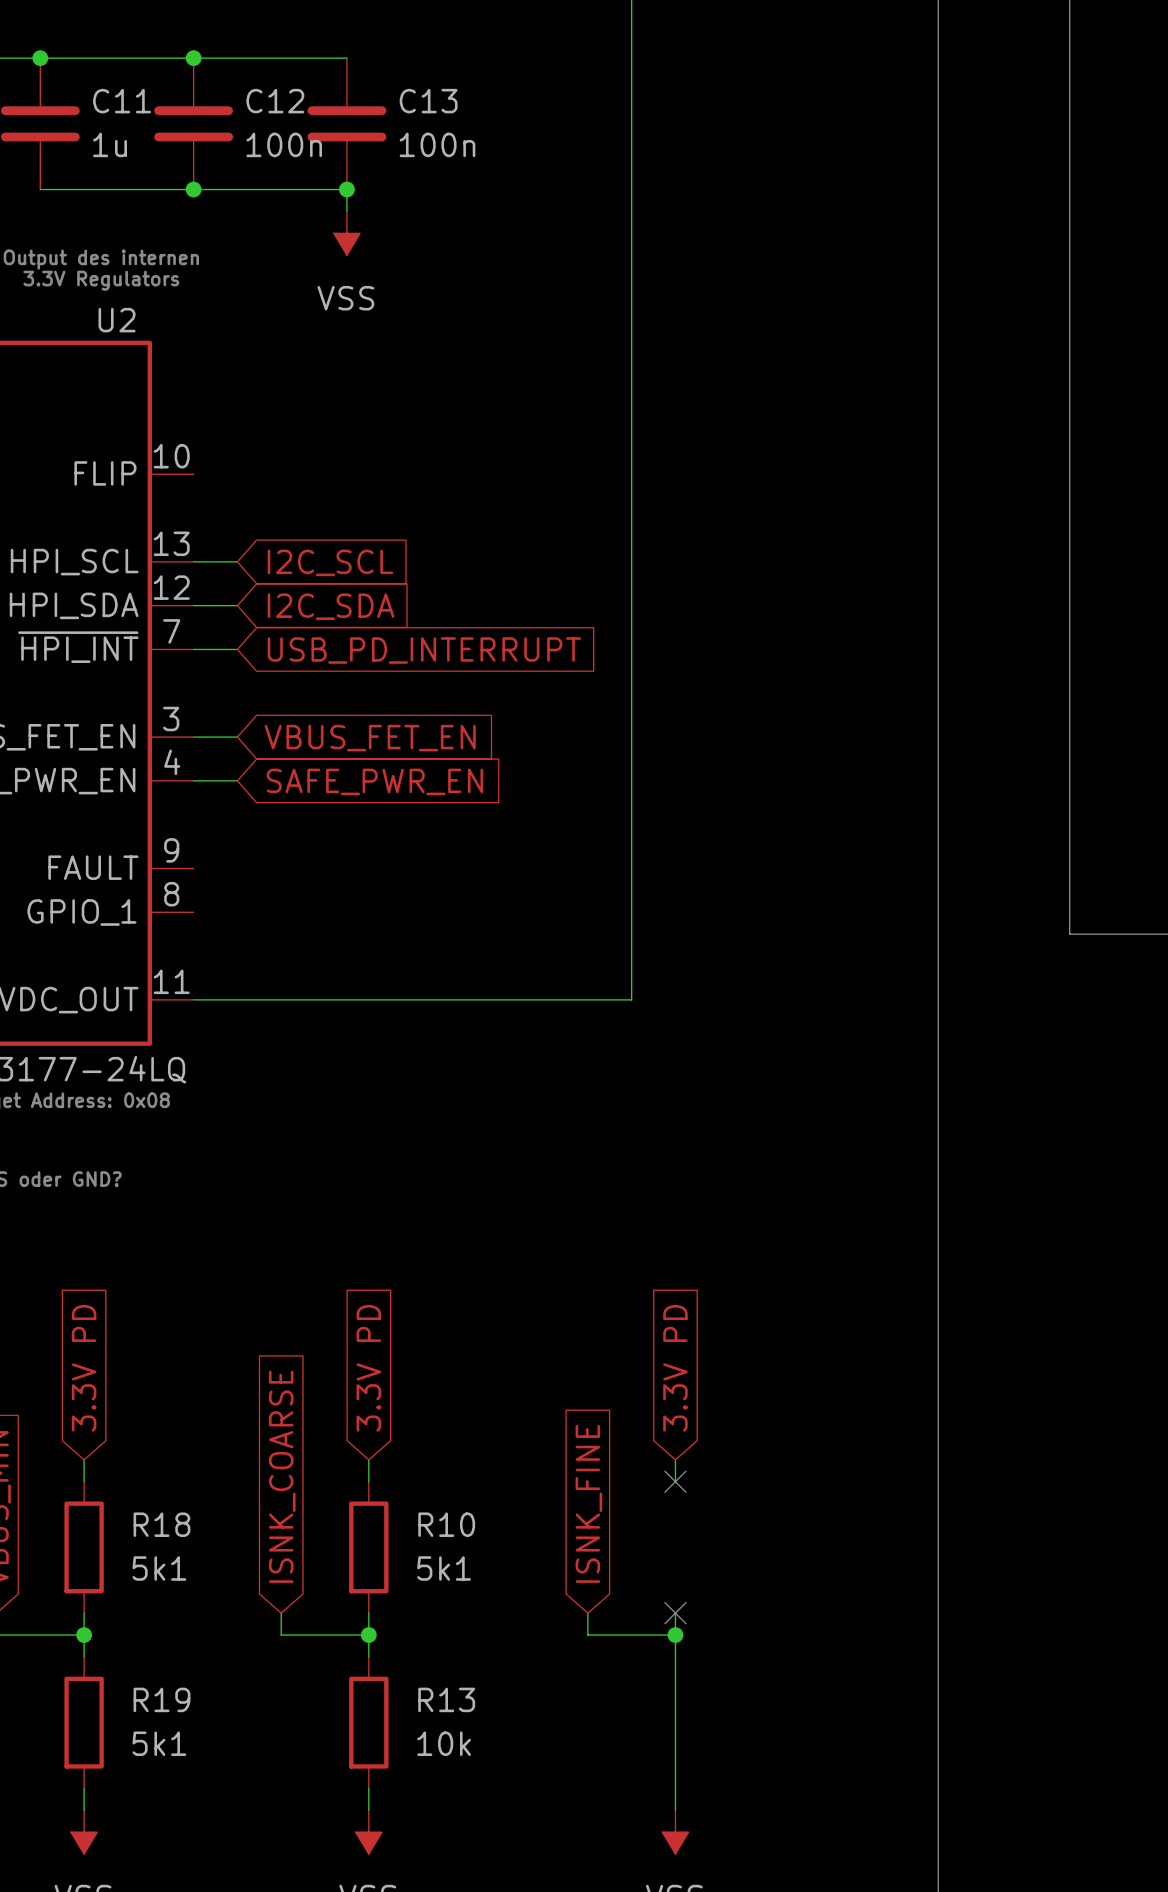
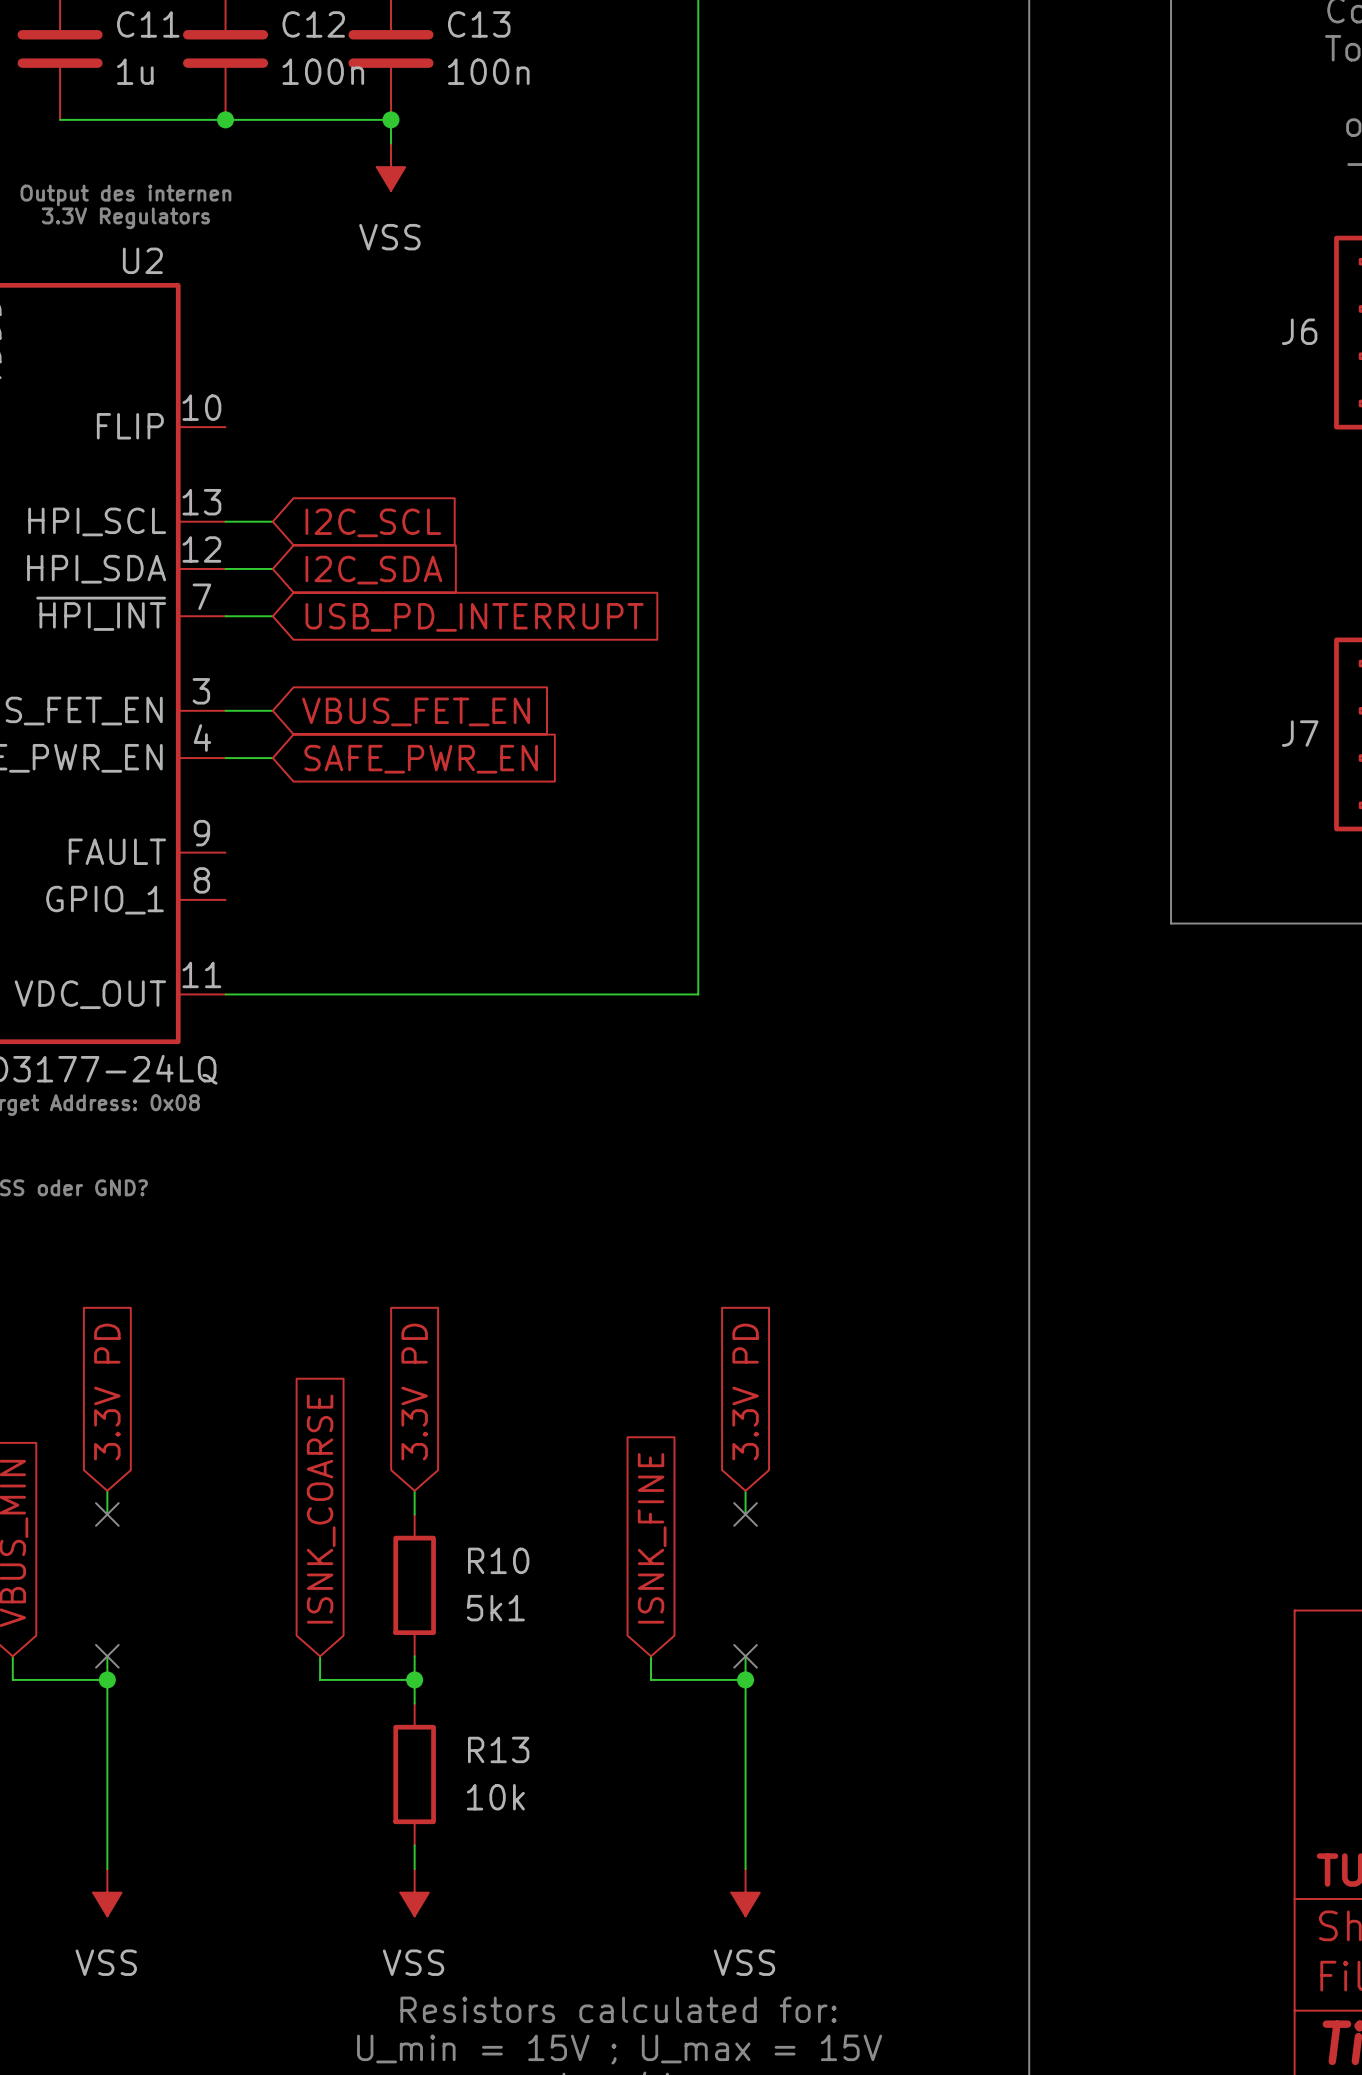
no-connect mark: none -> (107, 1514)
R18: 5k1 (84, 1547) -> none
no-connect mark: none -> (107, 1656)
wire: none -> (107, 1703) (107, 1845)
R19: 5k1 (84, 1722) -> none

